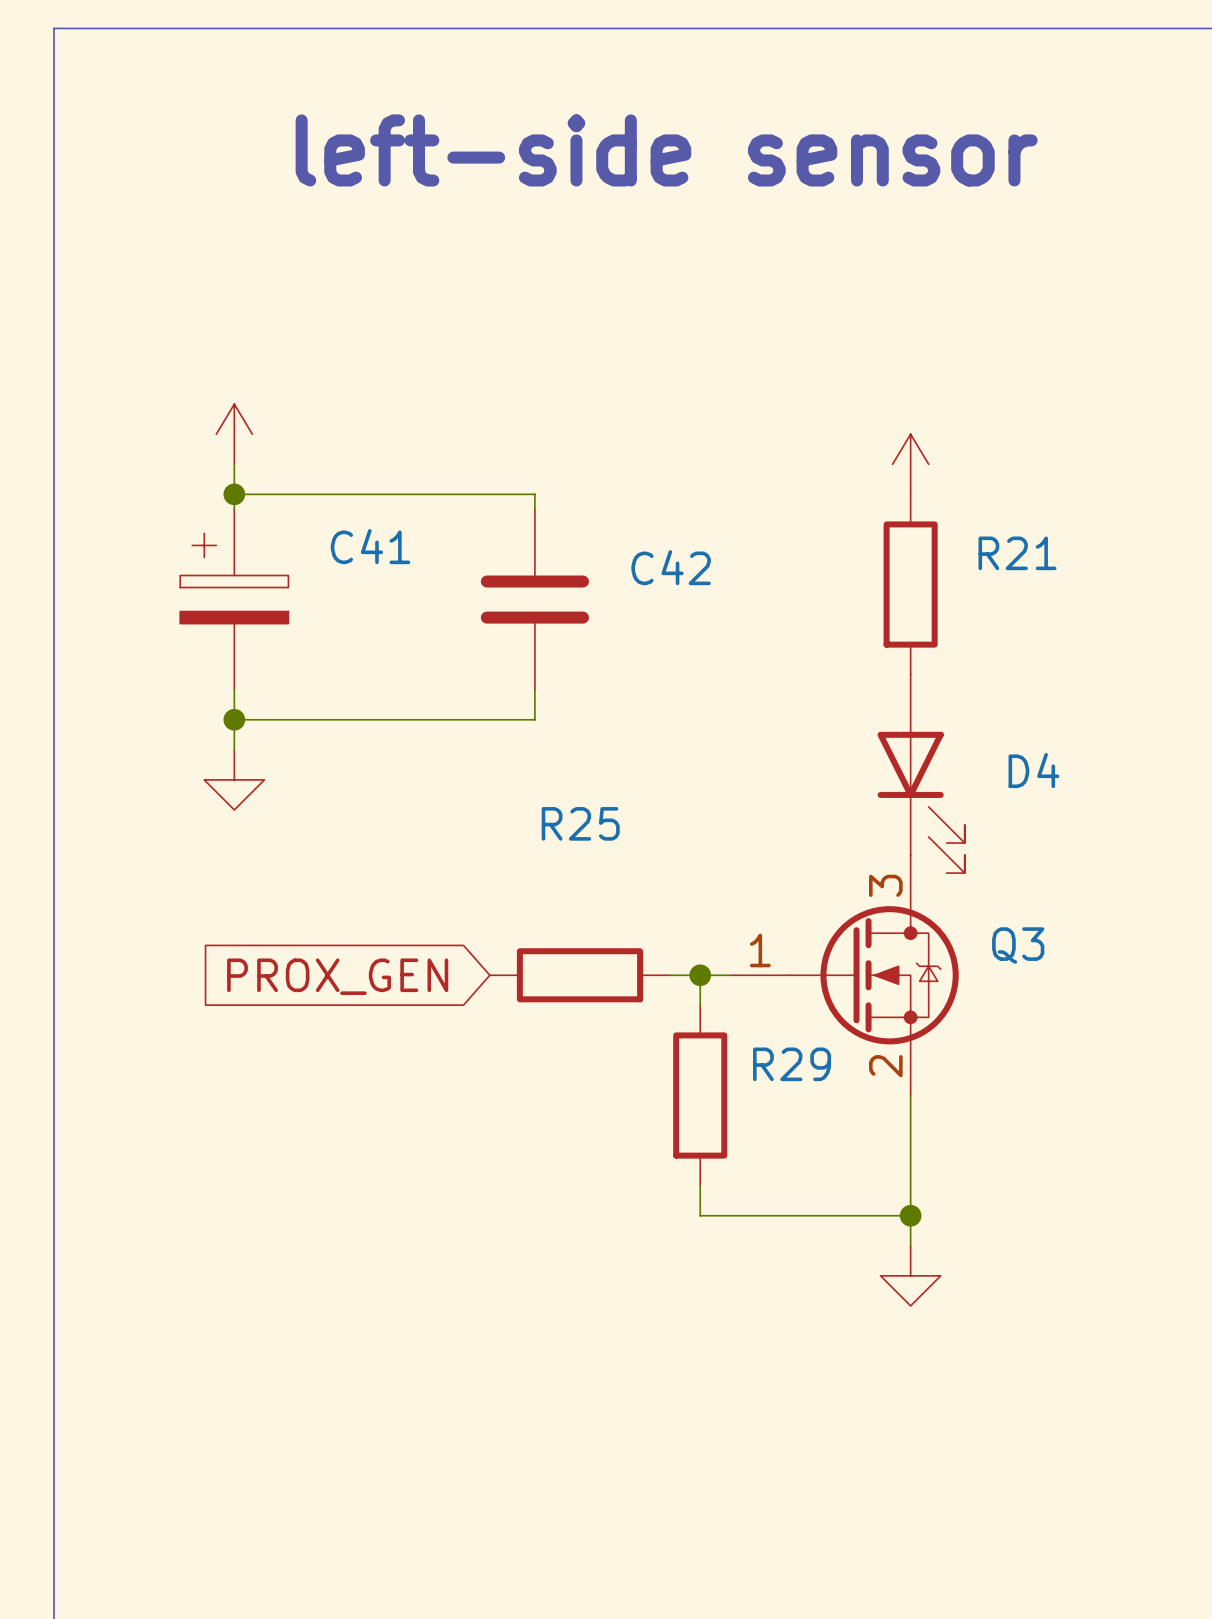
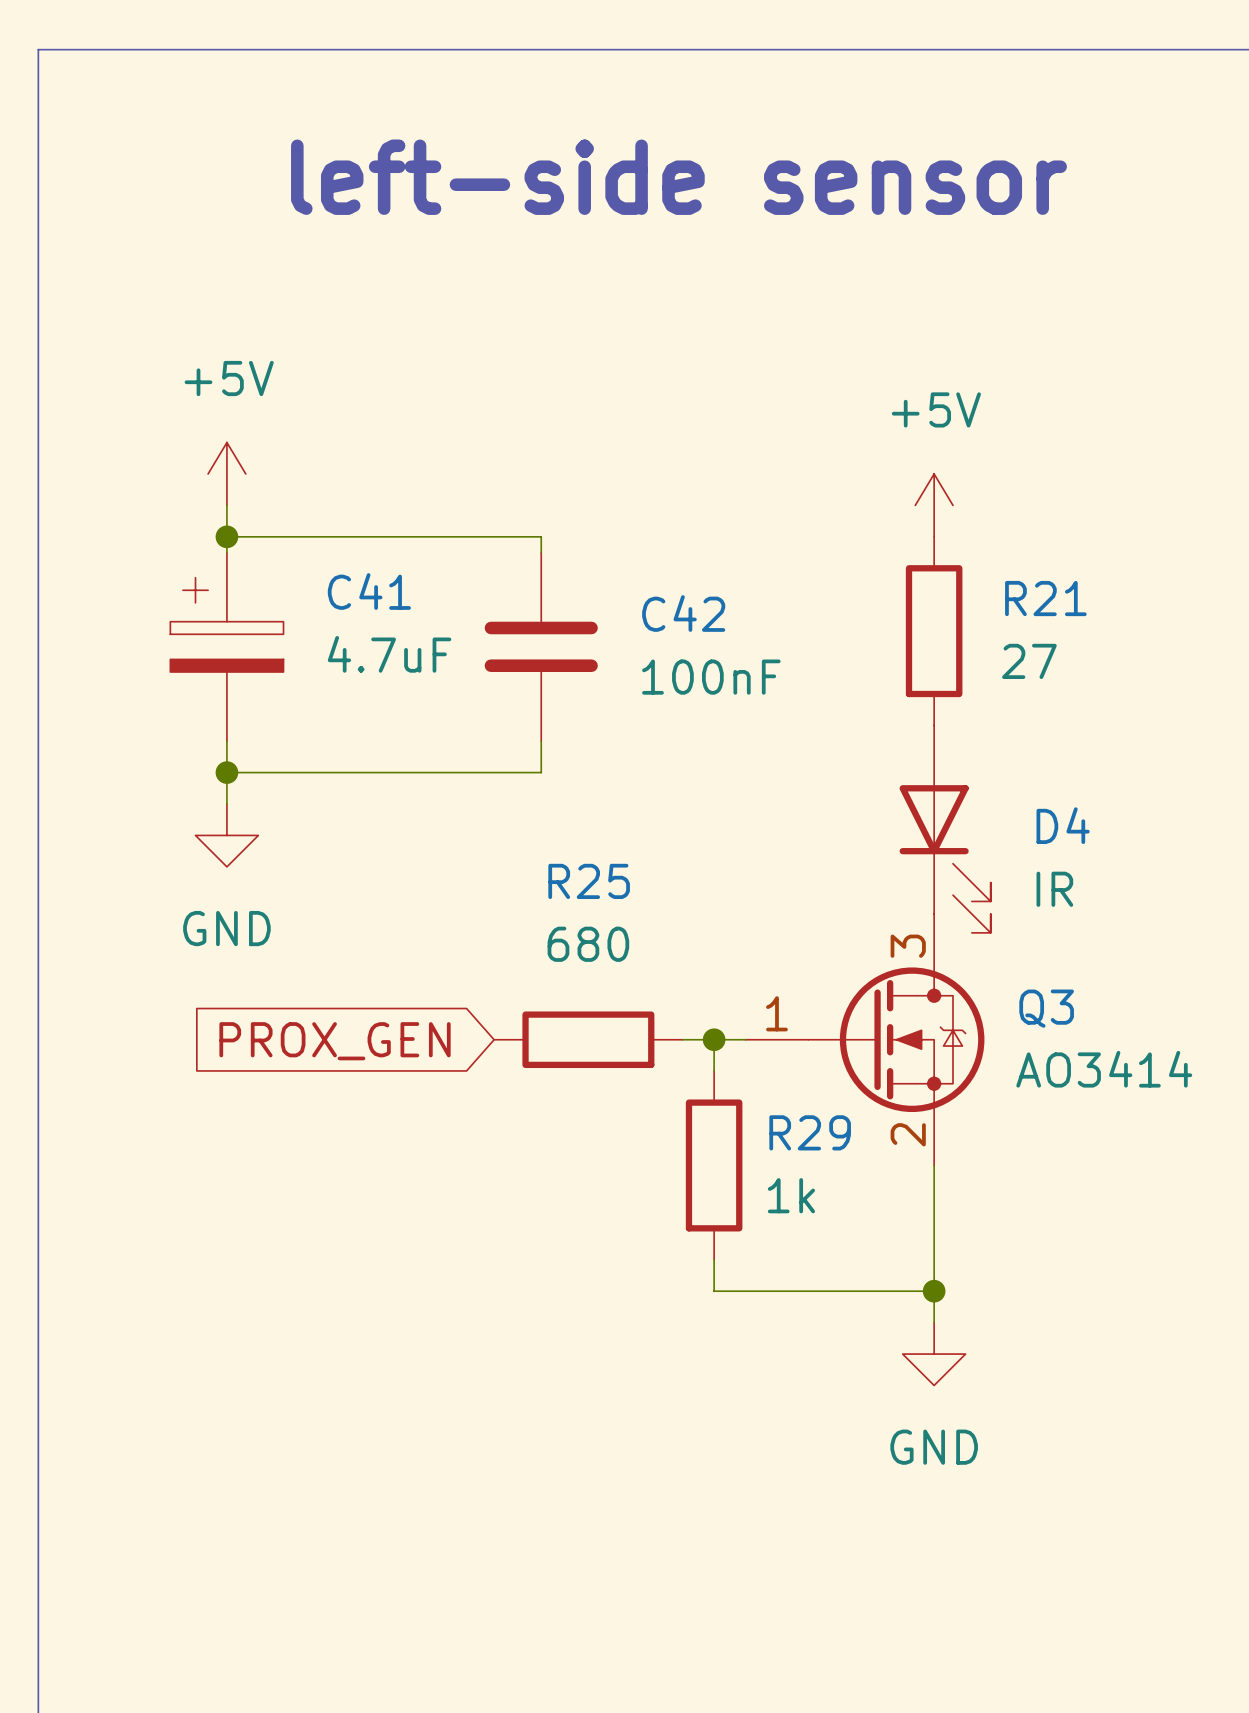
power symbol text: none -> +5V (229, 378)
power symbol text: none -> +5V (936, 409)
C41 value: none -> 4.7uF (389, 654)
R21 value: none -> 27 (1029, 661)
C42 value: none -> 100nF (711, 677)
D4 value: none -> IR (1054, 889)
power symbol text: none -> GND (226, 928)
R25 value: none -> 680 (588, 944)
Q3 value: none -> AO3414 (1104, 1069)
R29 value: none -> 1k (791, 1195)
power symbol text: none -> GND (934, 1447)

